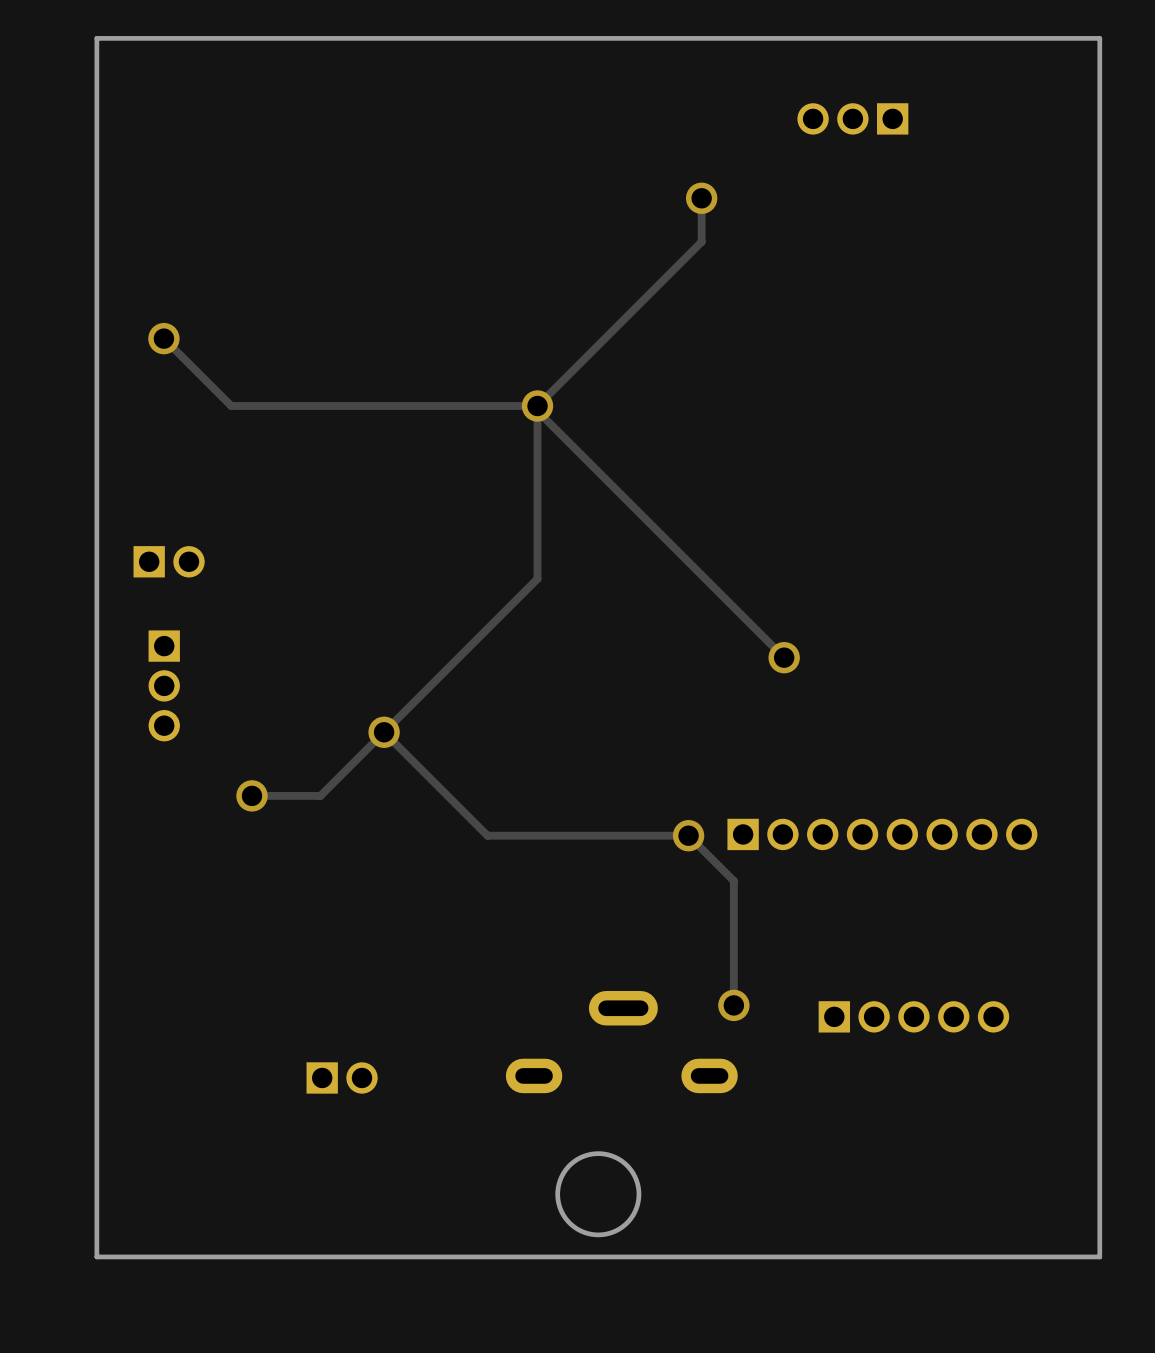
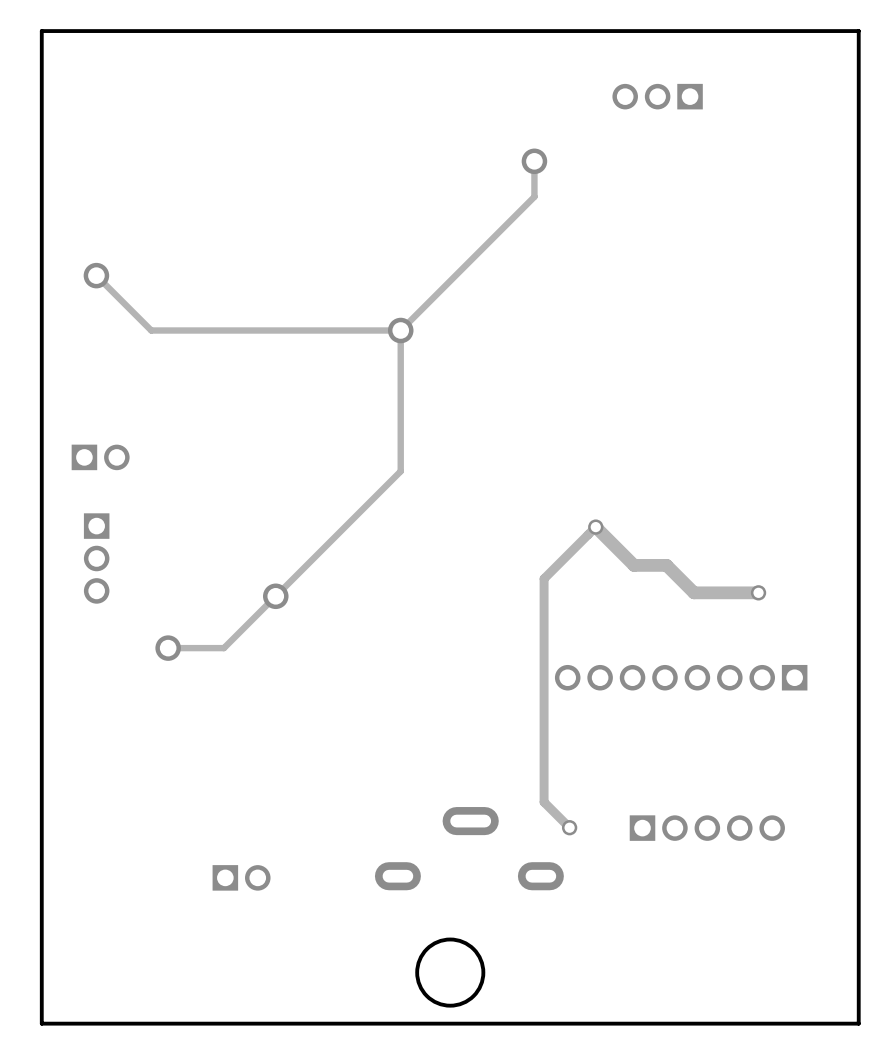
track: (537, 411) (784, 657) -> none
via size: [768, 642, 800, 674] -> [588, 519, 604, 535]
track: none -> (758, 592) (694, 592) (666, 565) (634, 565) (595, 527) (544, 578) (544, 802) (569, 827)
via: none -> (758, 592)
track: (384, 732) (487, 835) (688, 835) (733, 880) (733, 1005) -> none
part rotation: 0° (882, 834) -> 180° (681, 677)
via: (688, 835) -> none
via size: [718, 989, 750, 1022] -> [561, 820, 578, 836]

